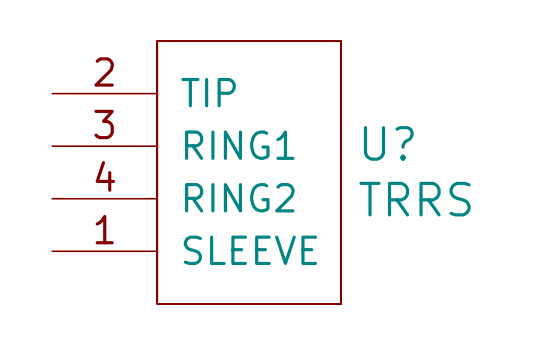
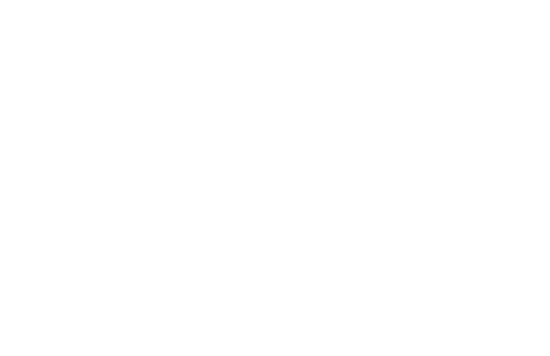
U?: TRRS (196, 172) -> none

